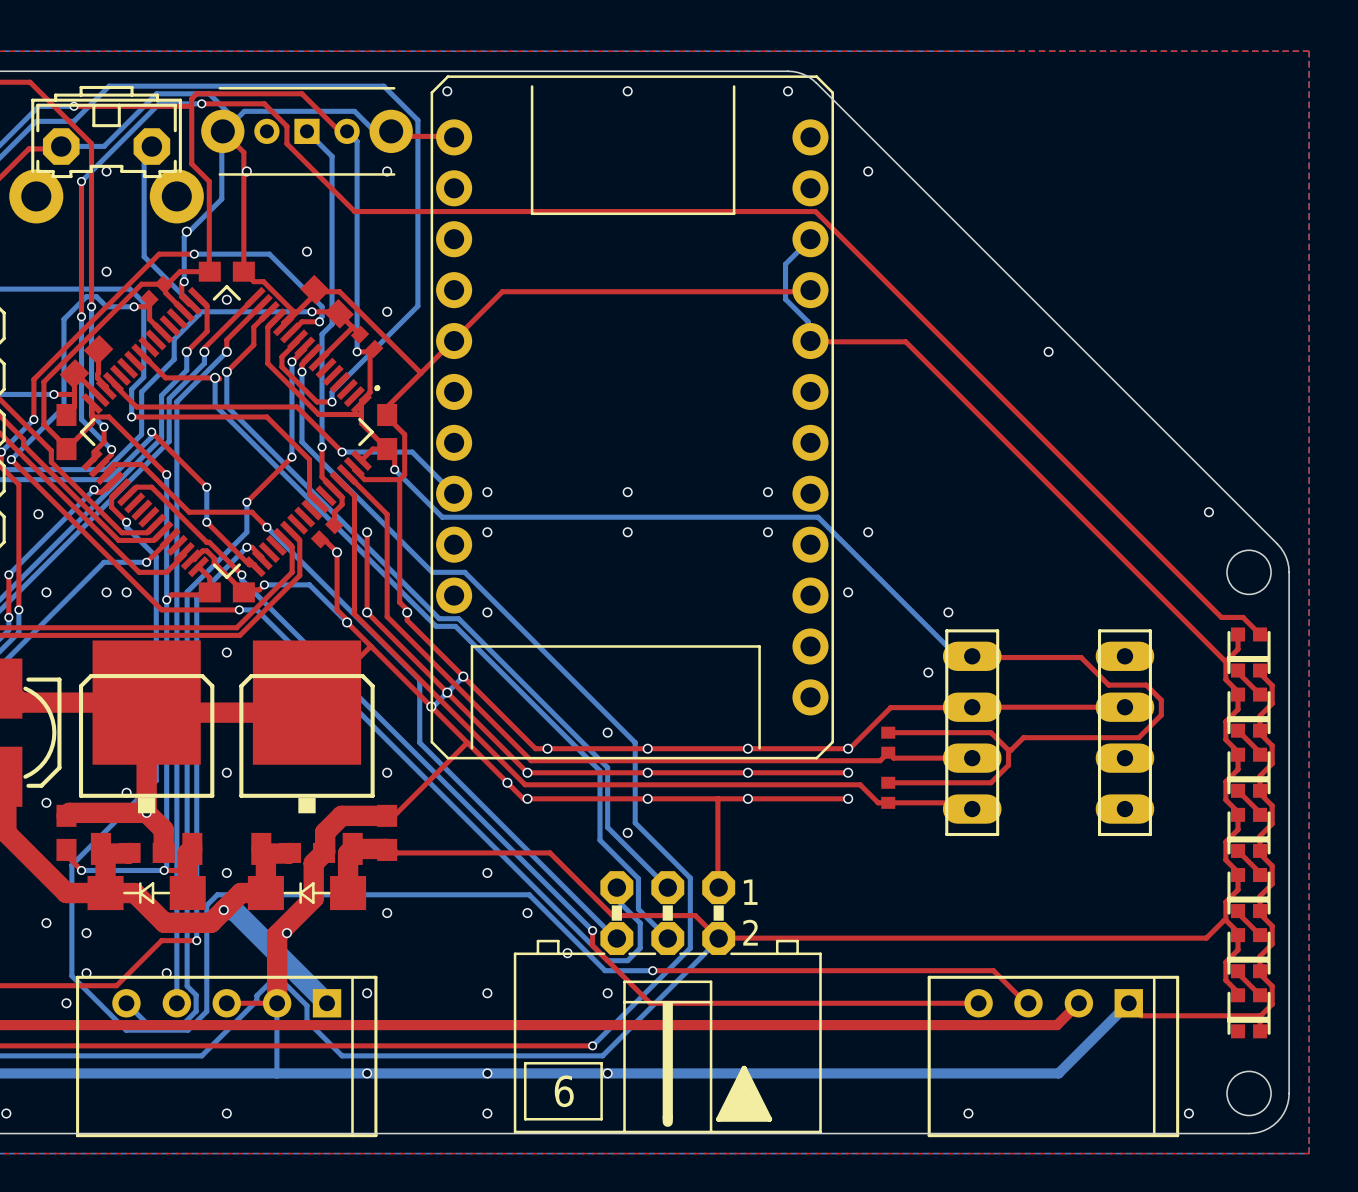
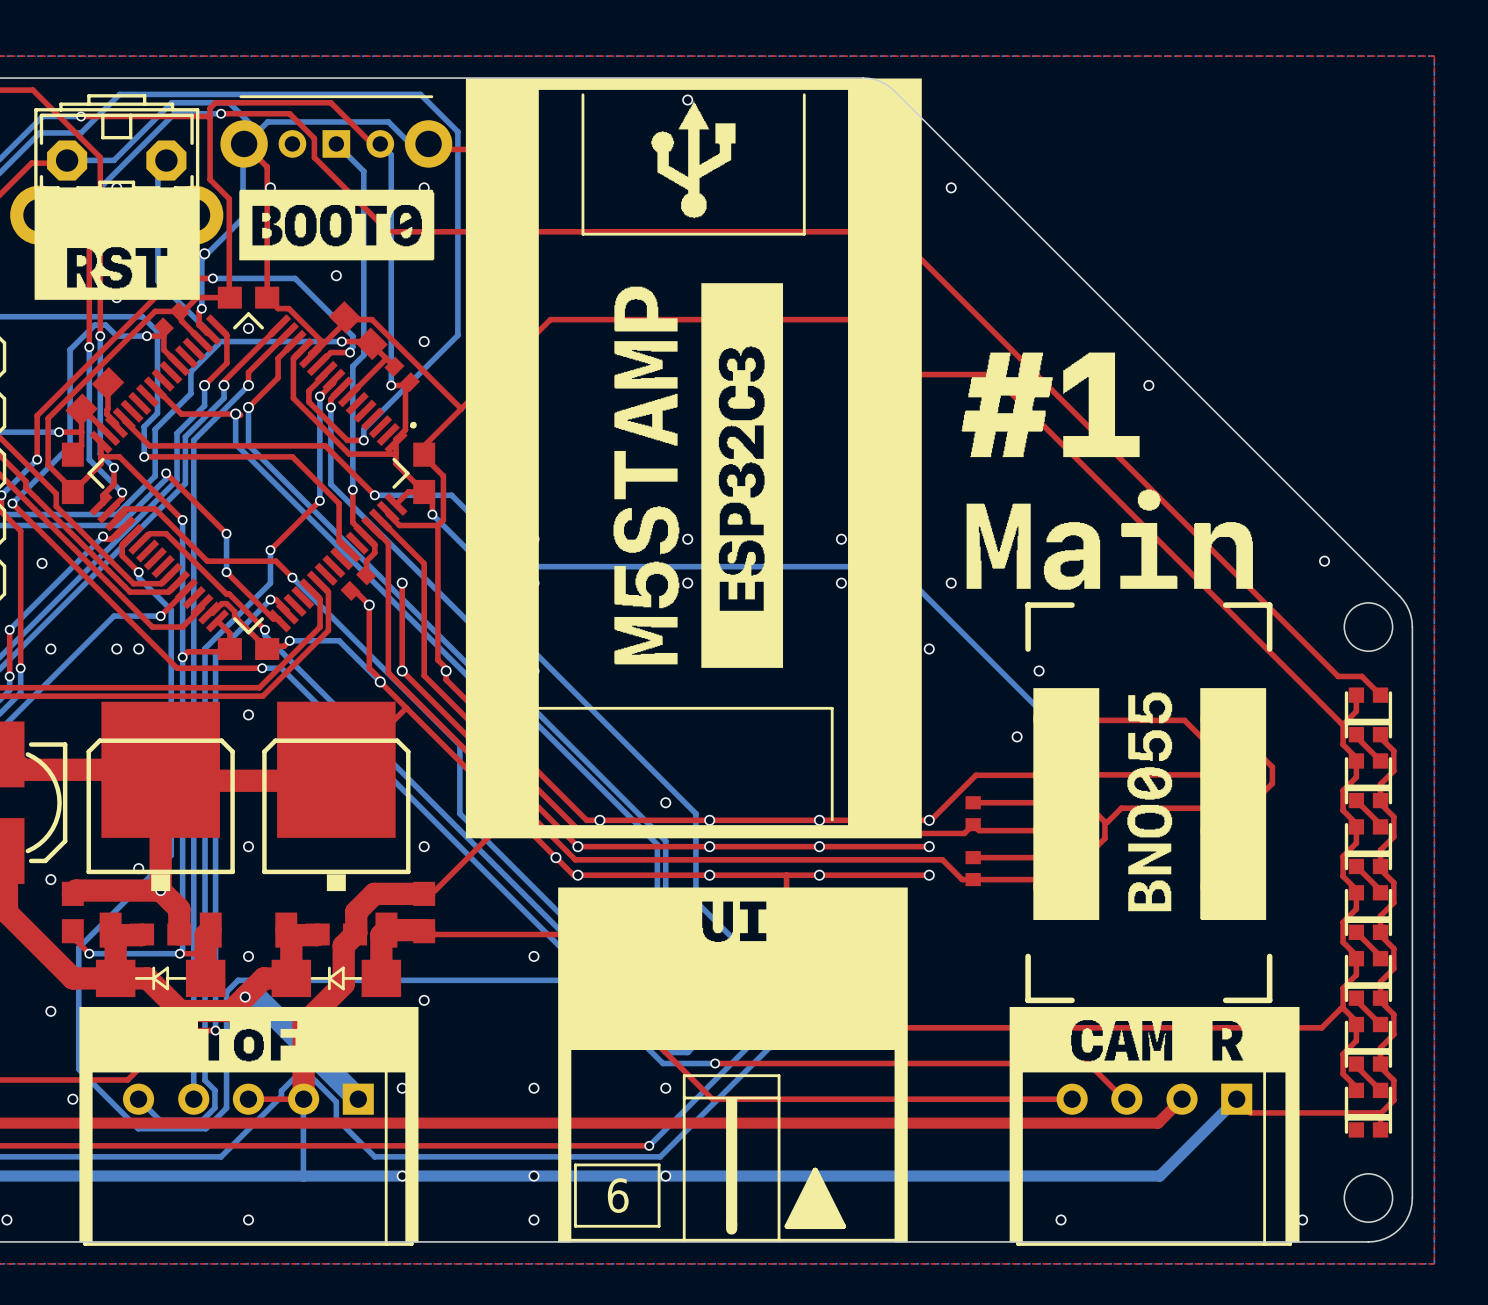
drawing: none -> [465, 78, 922, 839]
drawing: none -> [34, 187, 200, 300]
drawing: none -> [239, 191, 435, 261]
drawing: none -> [613, 283, 784, 668]
drawing: none -> [961, 352, 1140, 458]
drawing: none -> [966, 489, 1253, 590]
line: none -> (1072, 605) (1028, 605) (1028, 649)
line: none -> (1225, 605) (1269, 605) (1269, 649)
drawing: none -> [1033, 688, 1100, 921]
drawing: none -> [1200, 688, 1267, 921]
drawing: none -> [1127, 692, 1173, 912]
drawing: none -> [558, 887, 908, 1243]
line: none -> (1028, 956) (1028, 1000) (1072, 1000)
line: none -> (1269, 956) (1269, 1000) (1225, 1000)
drawing: none -> [79, 1006, 419, 1243]
drawing: none -> [1009, 1006, 1300, 1243]

